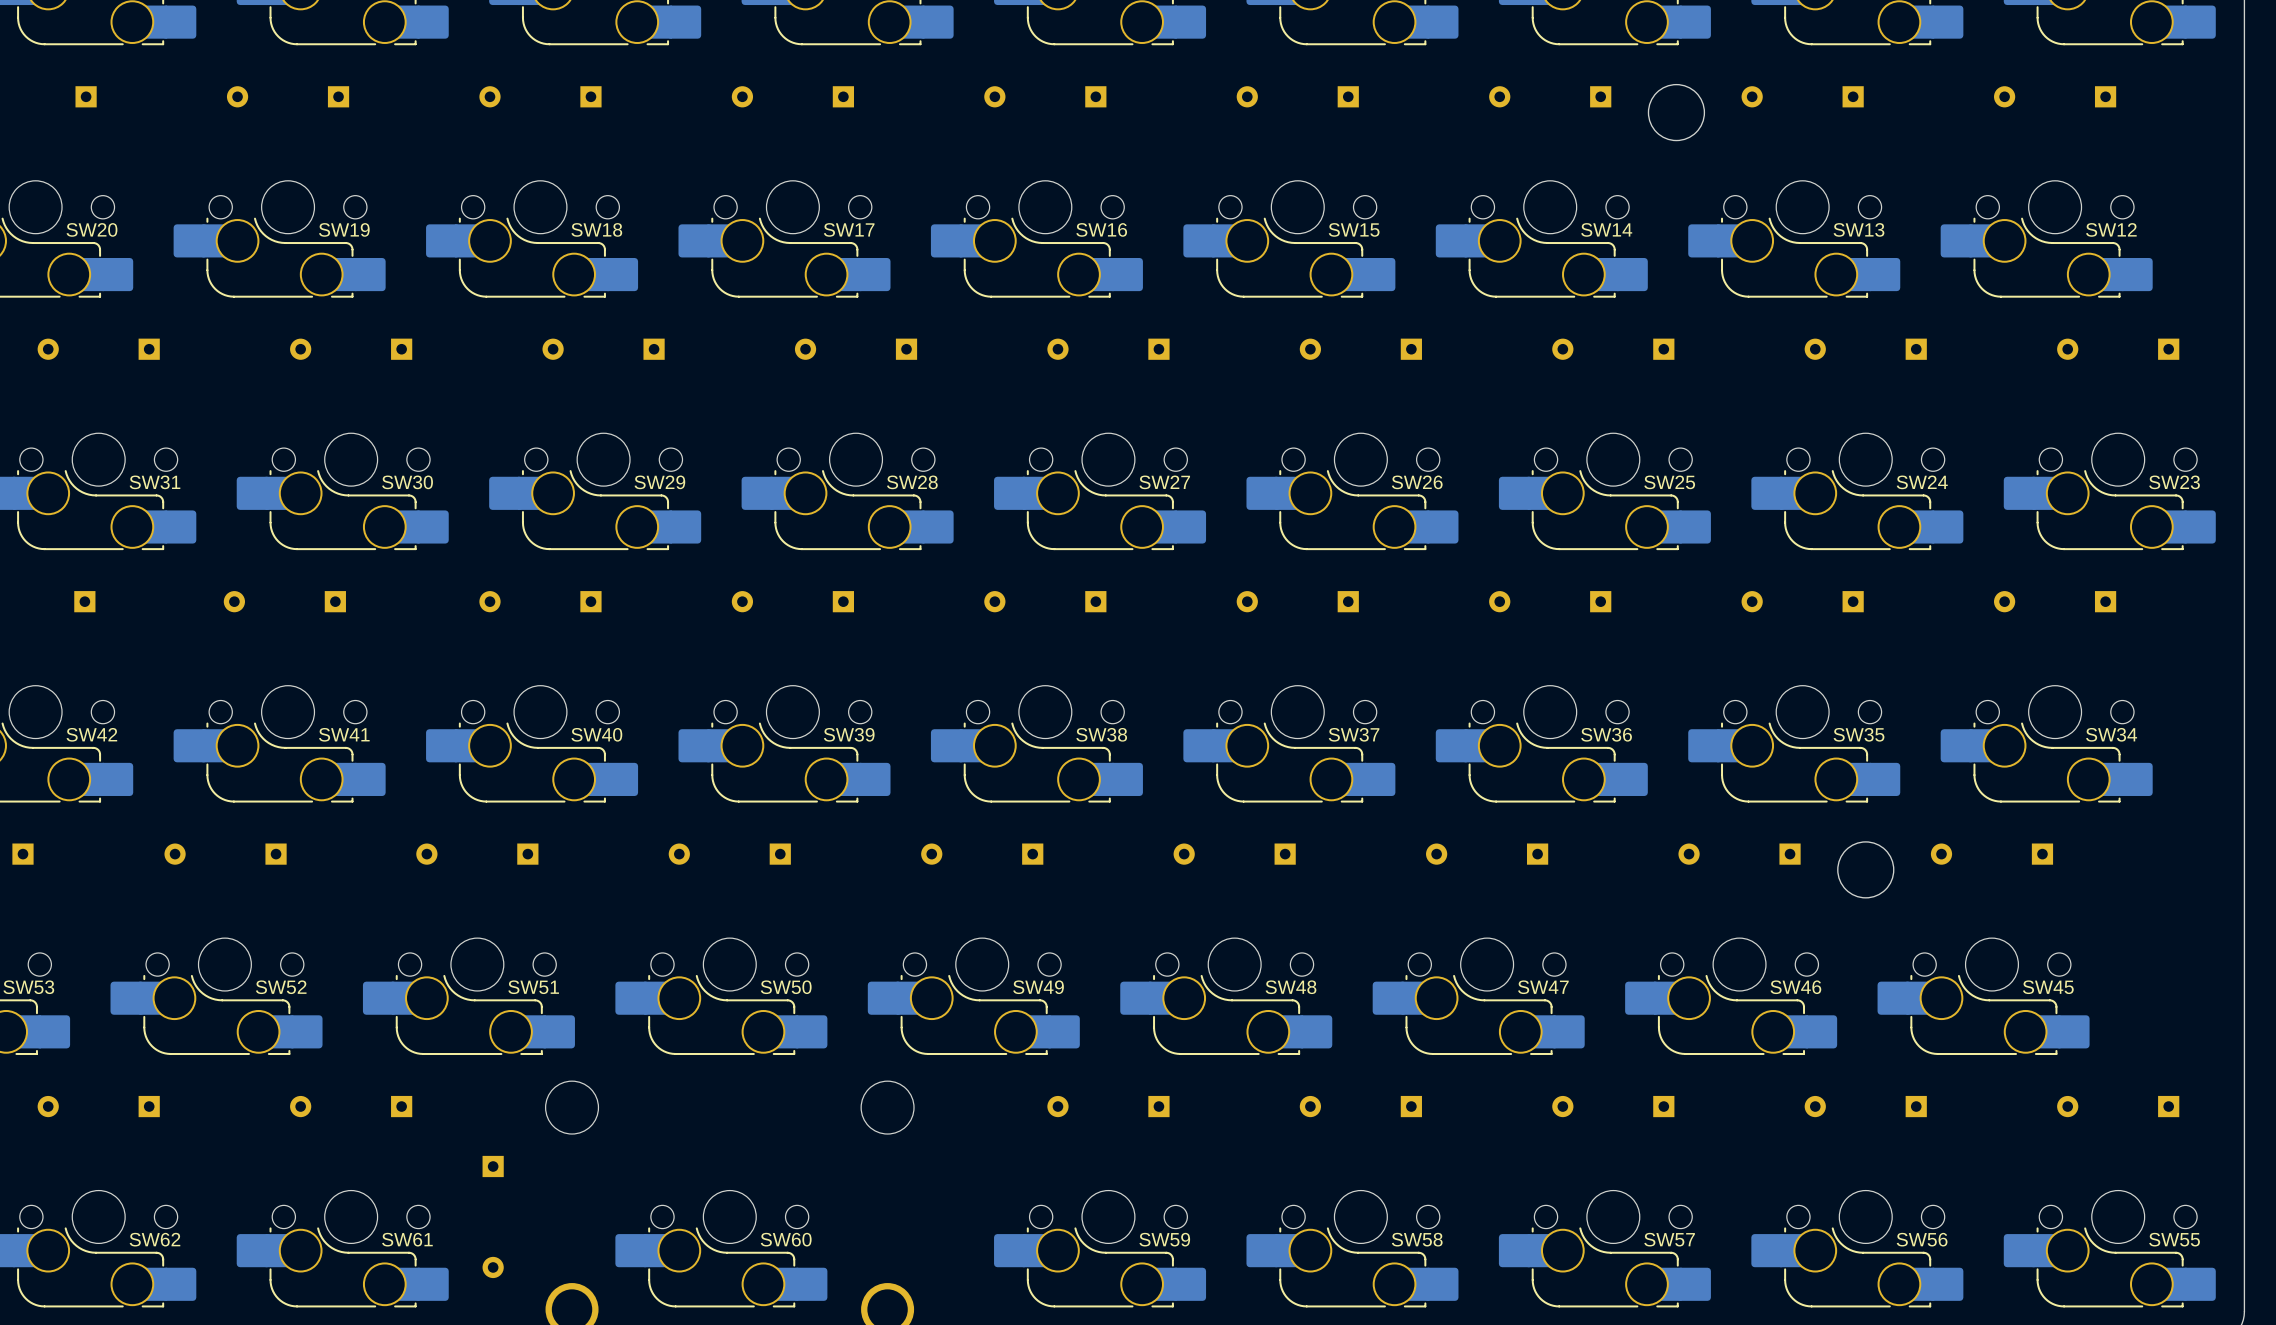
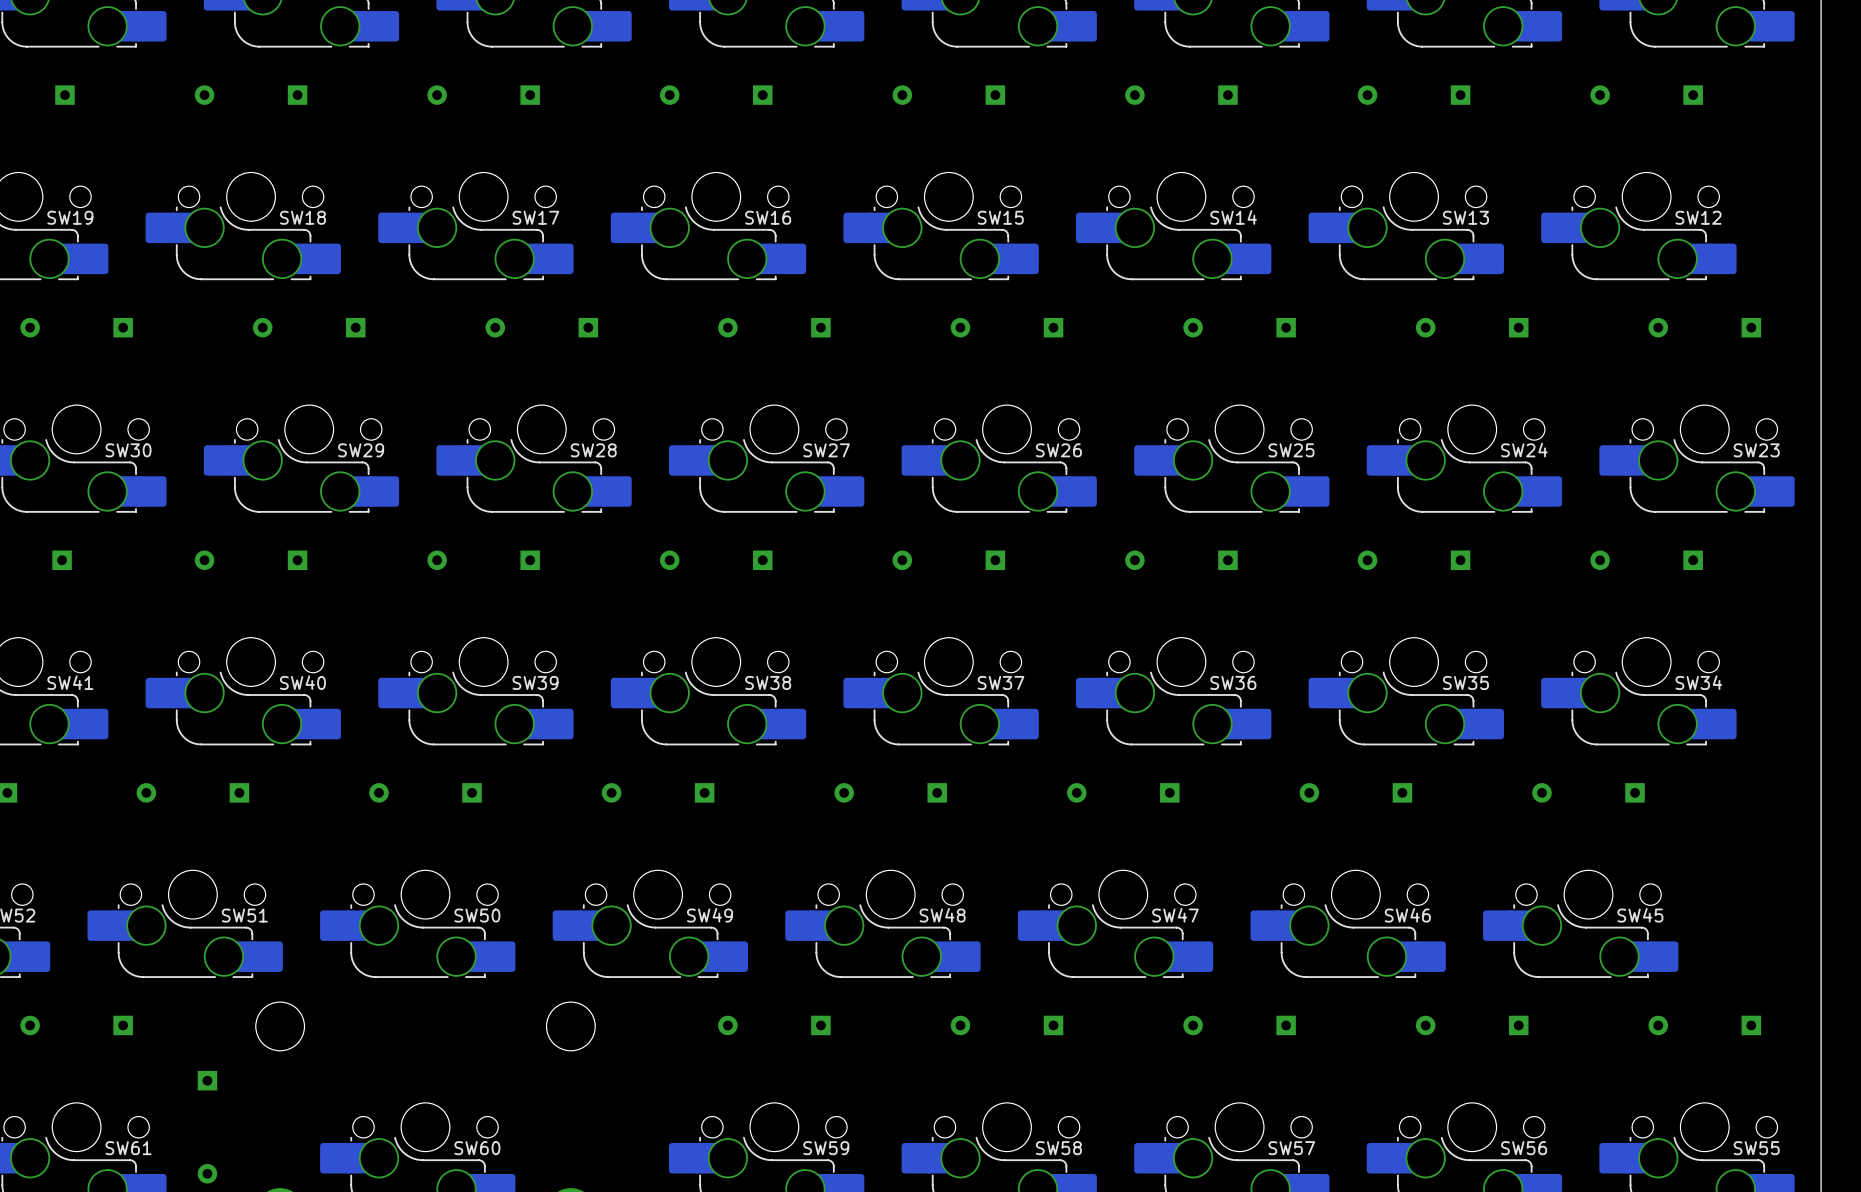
round board edge: [1647, 83, 1706, 142] -> none
round board edge: [1837, 841, 1895, 899] -> none

